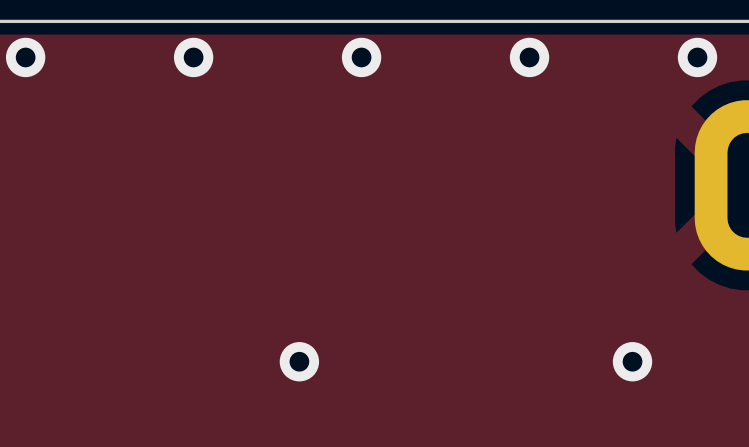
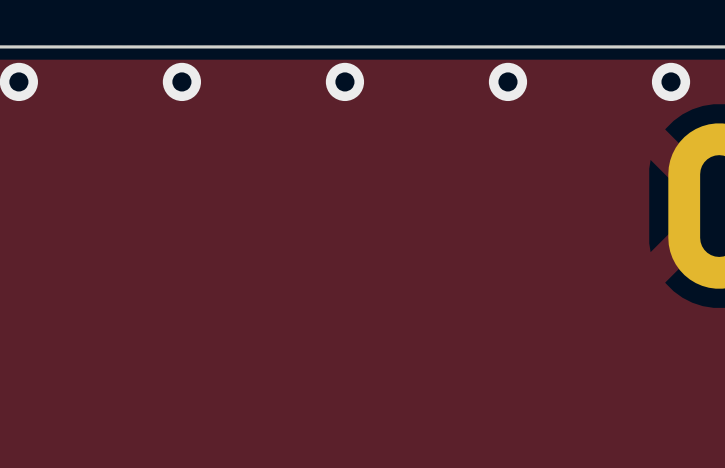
via: (299, 361) -> none
via: (632, 361) -> none

